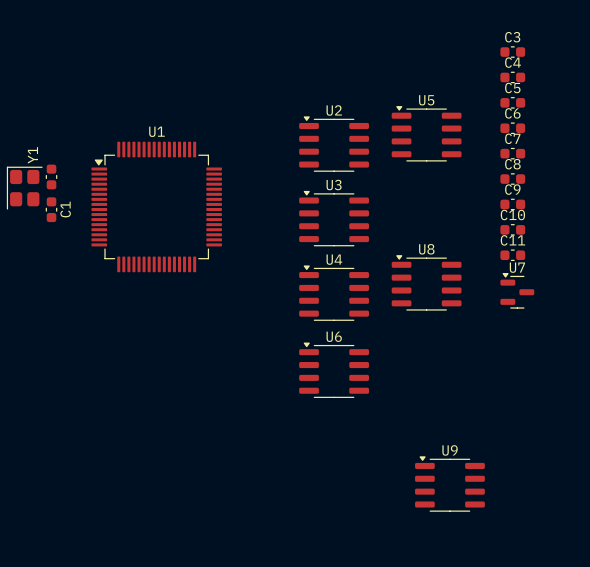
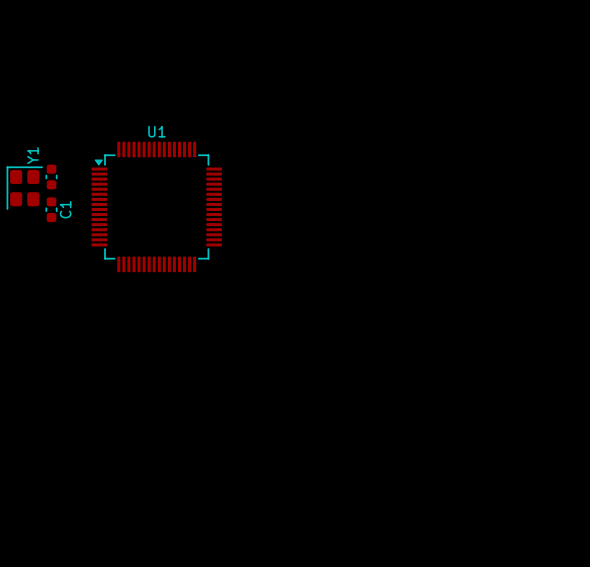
C3: (512, 52) -> none
C4: (512, 77) -> none
C5: (512, 102) -> none
C6: (512, 128) -> none
U5: (426, 133) -> none
U2: (334, 144) -> none
C7: (512, 153) -> none
C8: (512, 179) -> none
C9: (512, 204) -> none
U3: (334, 218) -> none
C10: (512, 229) -> none
C11: (512, 255) -> none
U8: (426, 282) -> none
U7: (517, 290) -> none
U4: (334, 293) -> none
U6: (334, 370) -> none
U9: (449, 484) -> none

